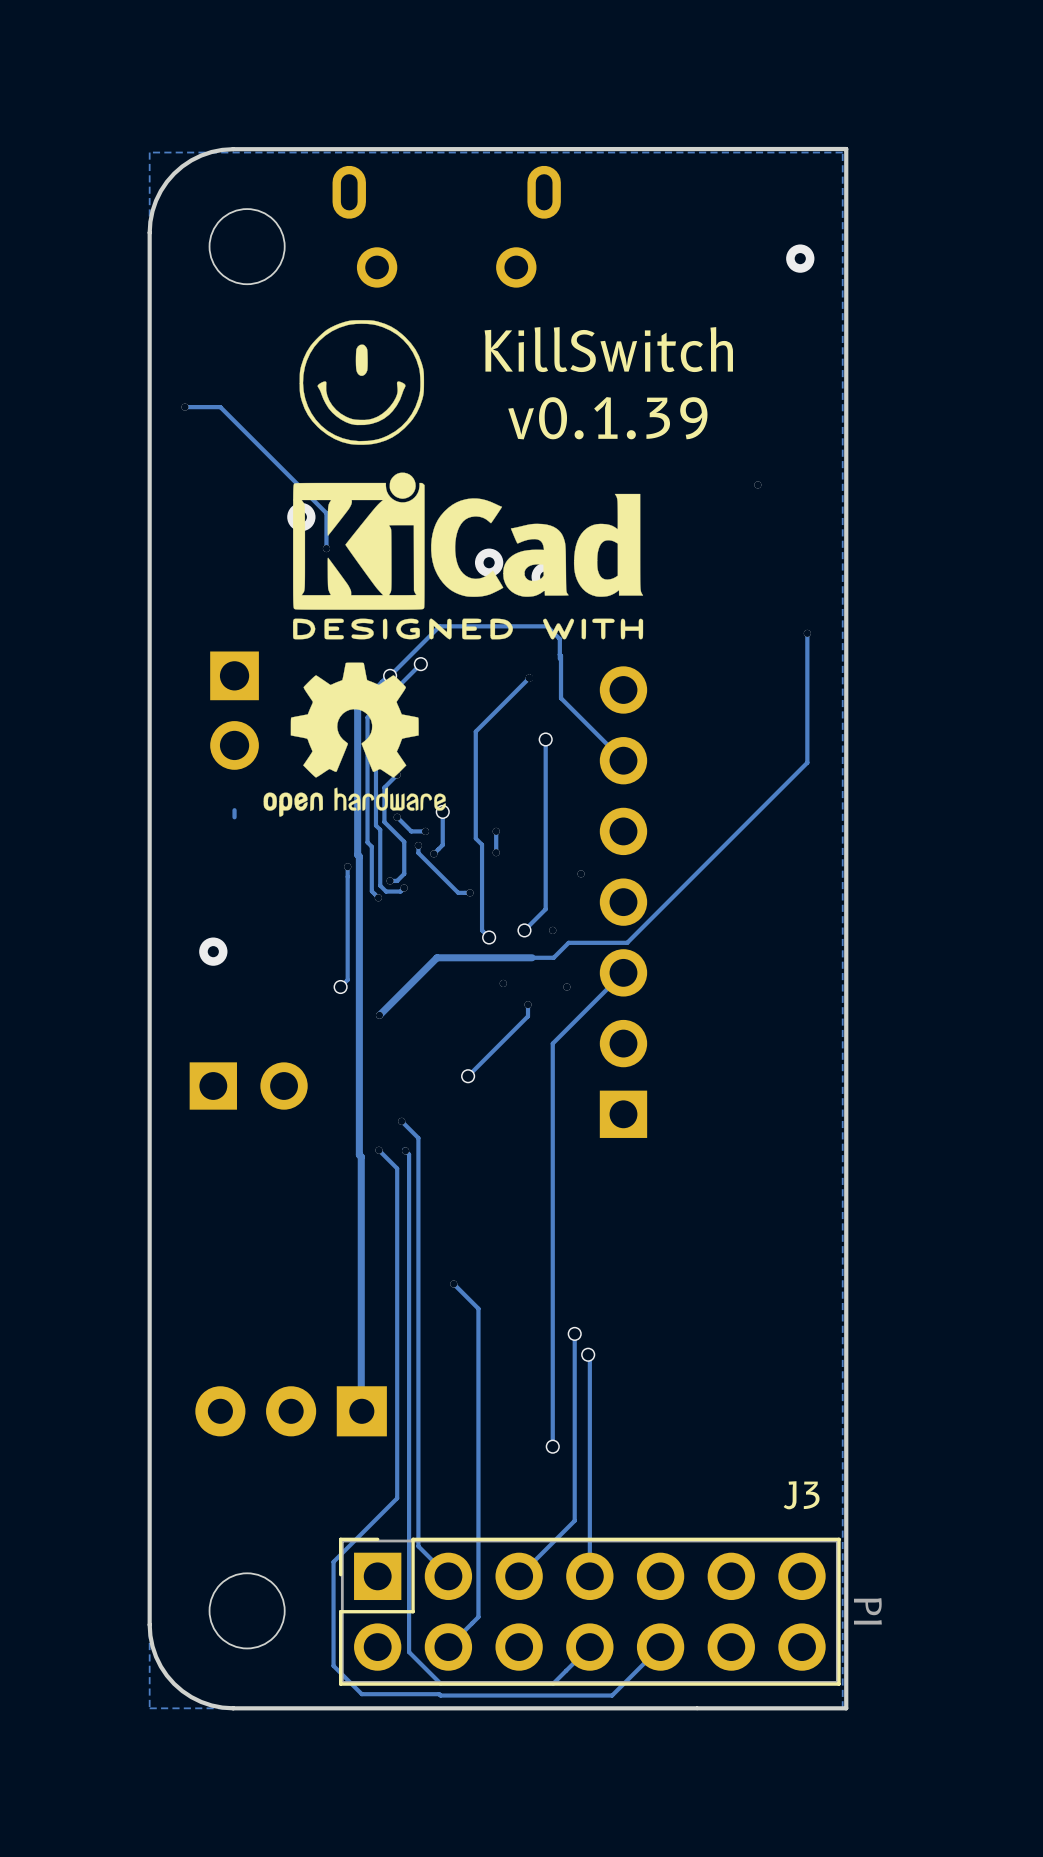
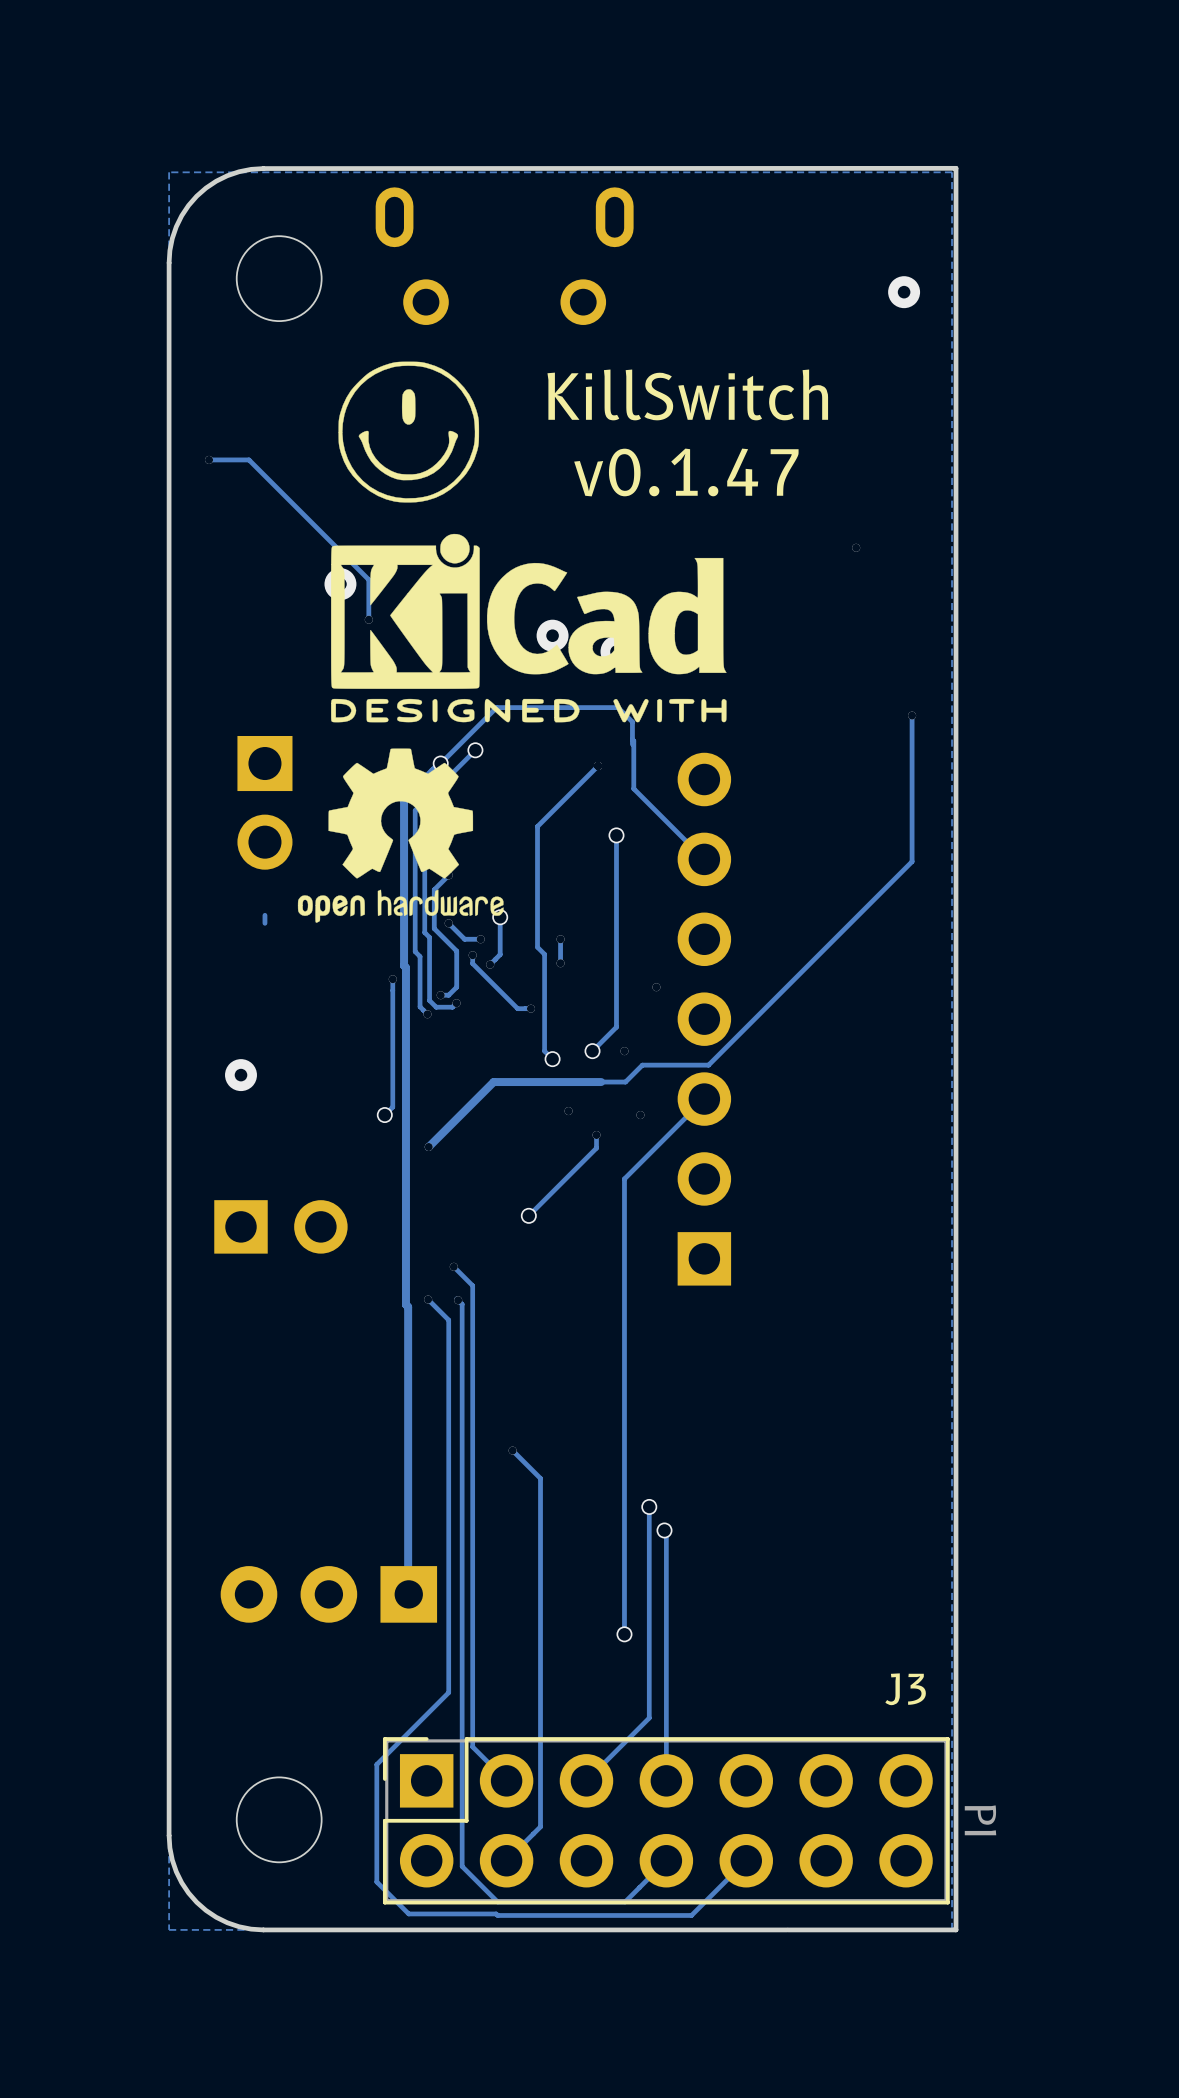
text: v0.1.39 (607, 418) -> v0.1.47 (686, 472)

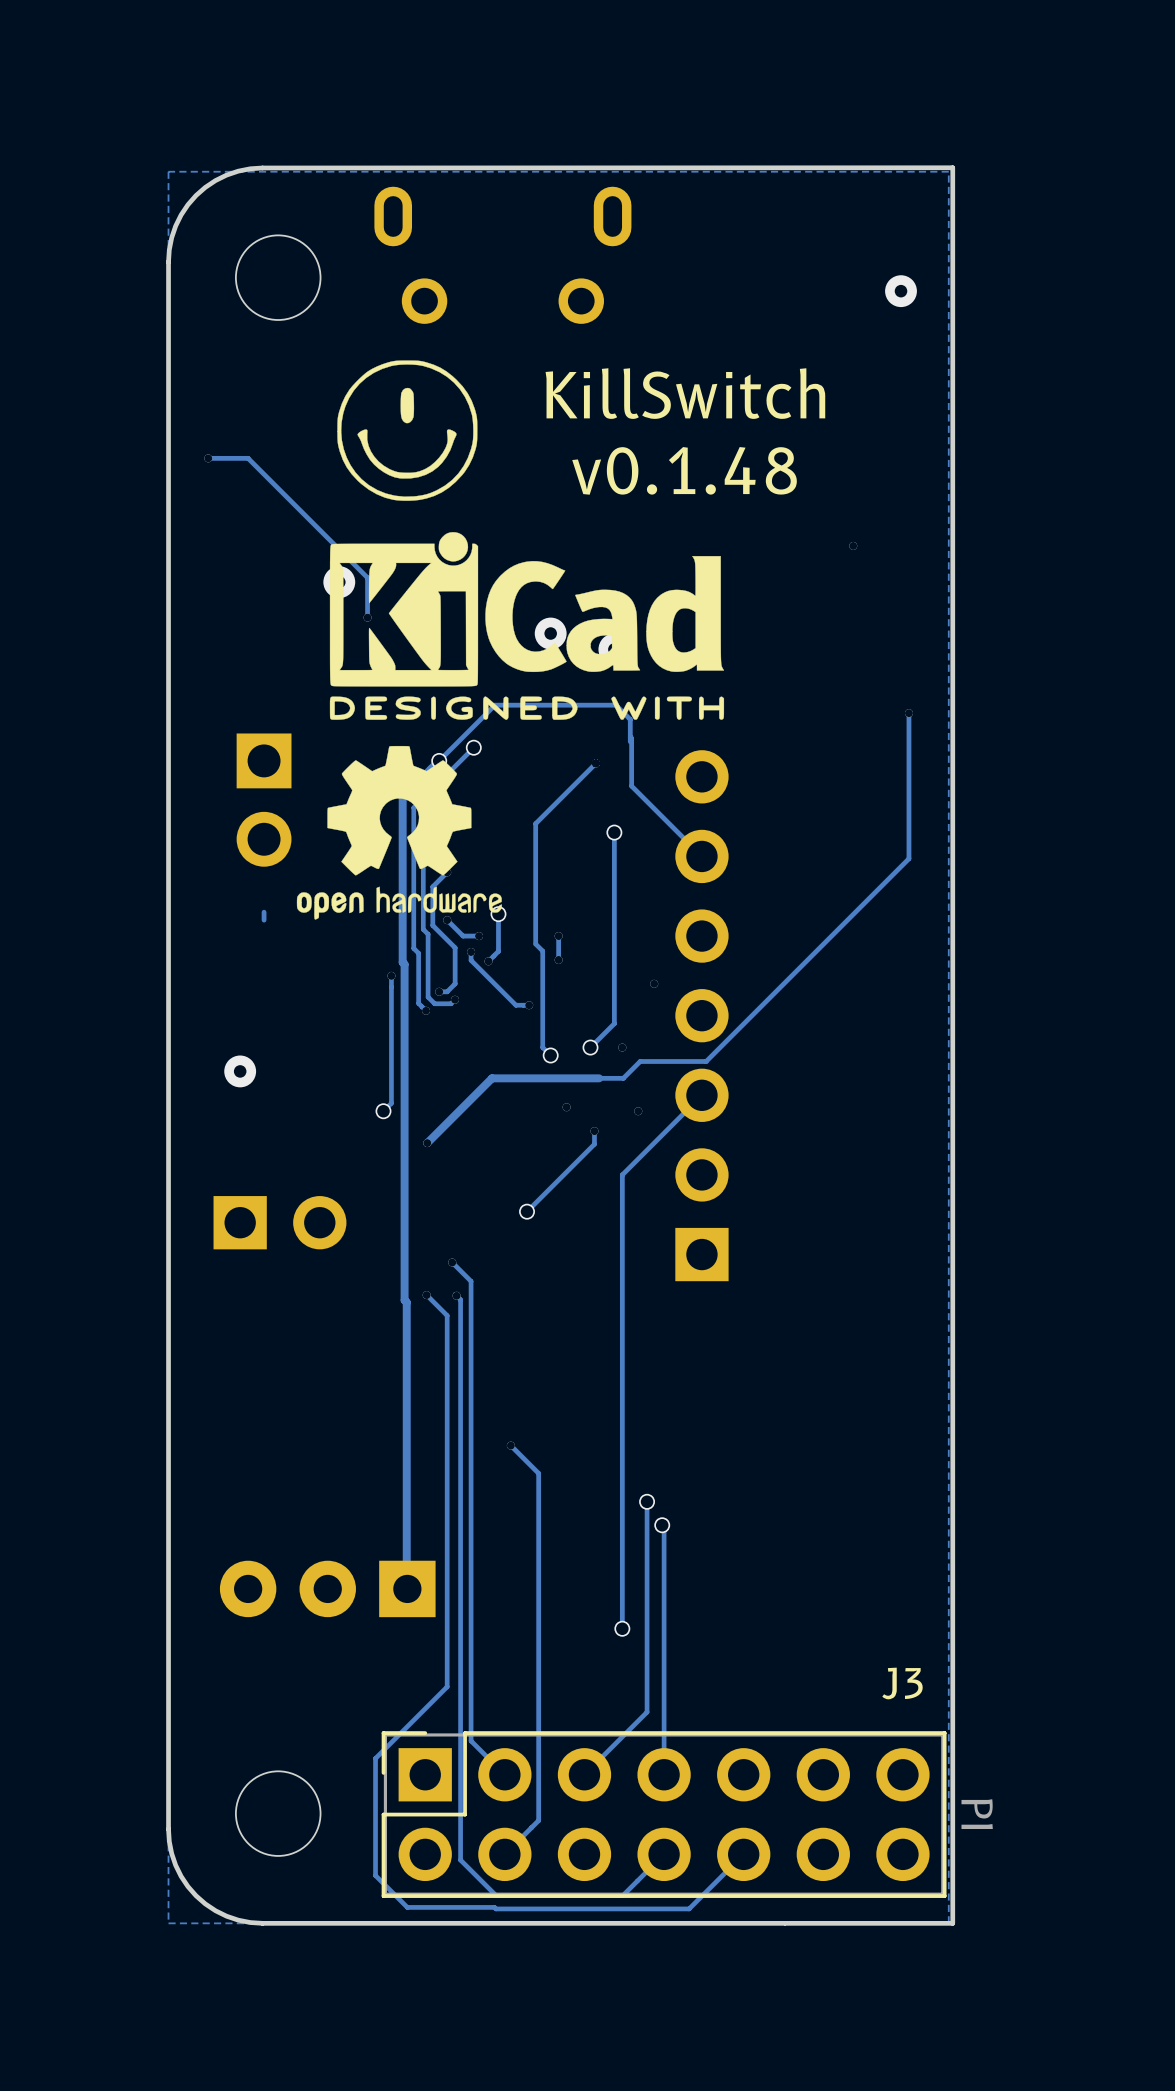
text: v0.1.47 (686, 472) -> v0.1.48 (684, 470)

